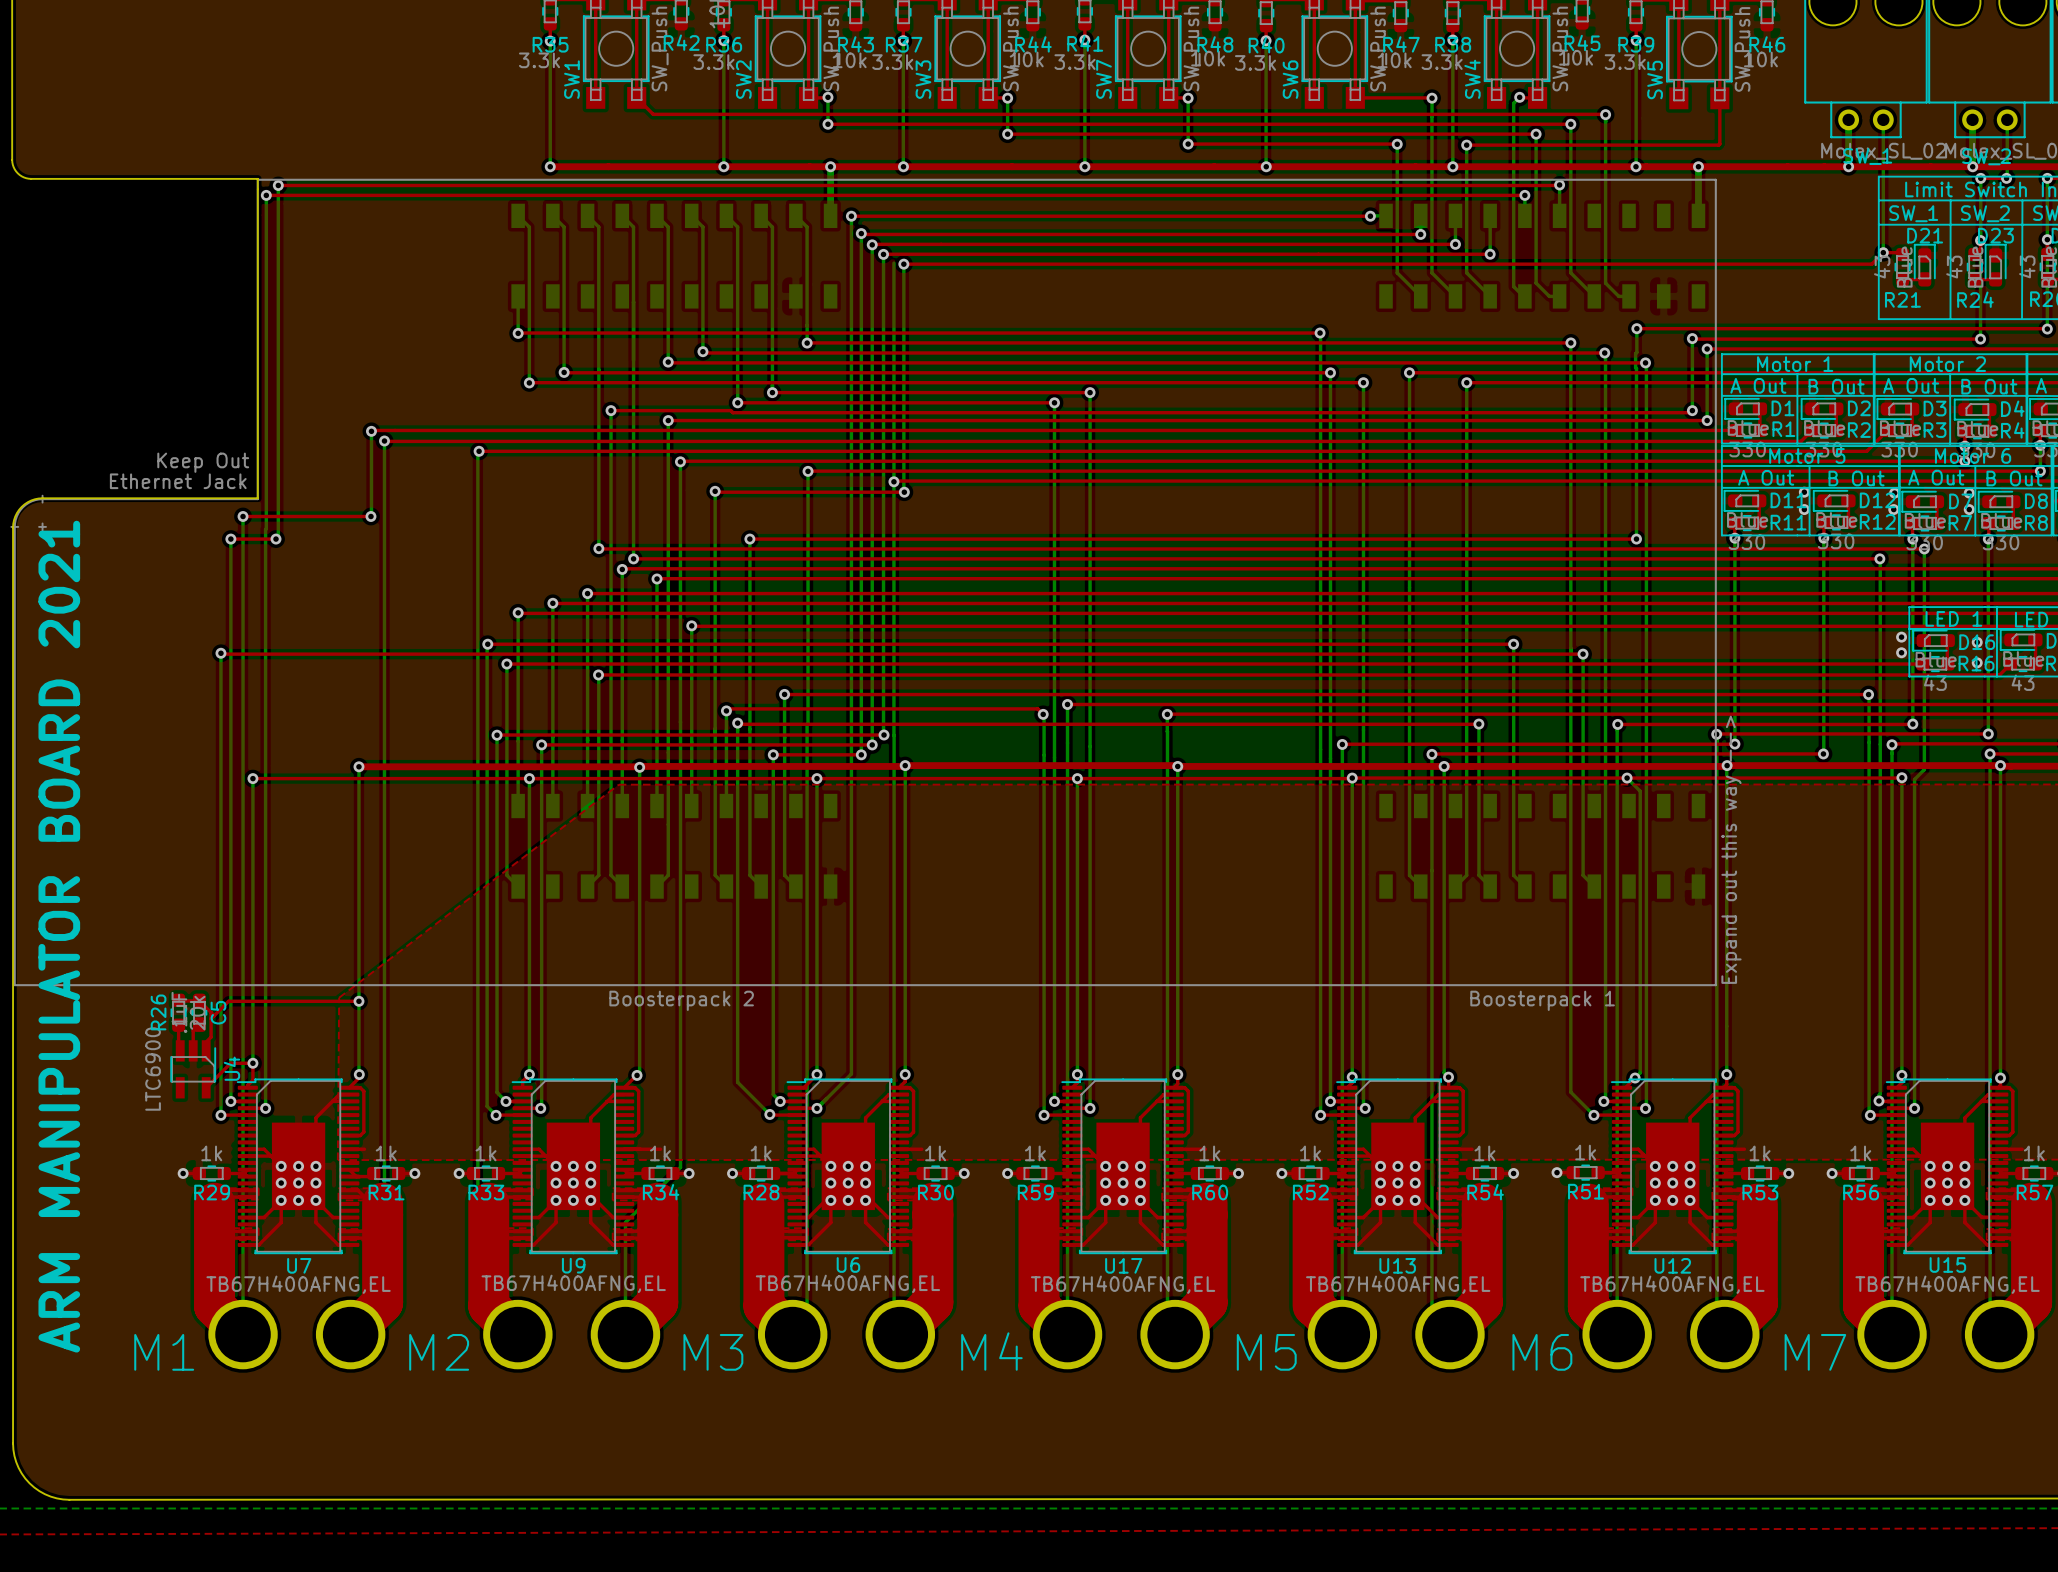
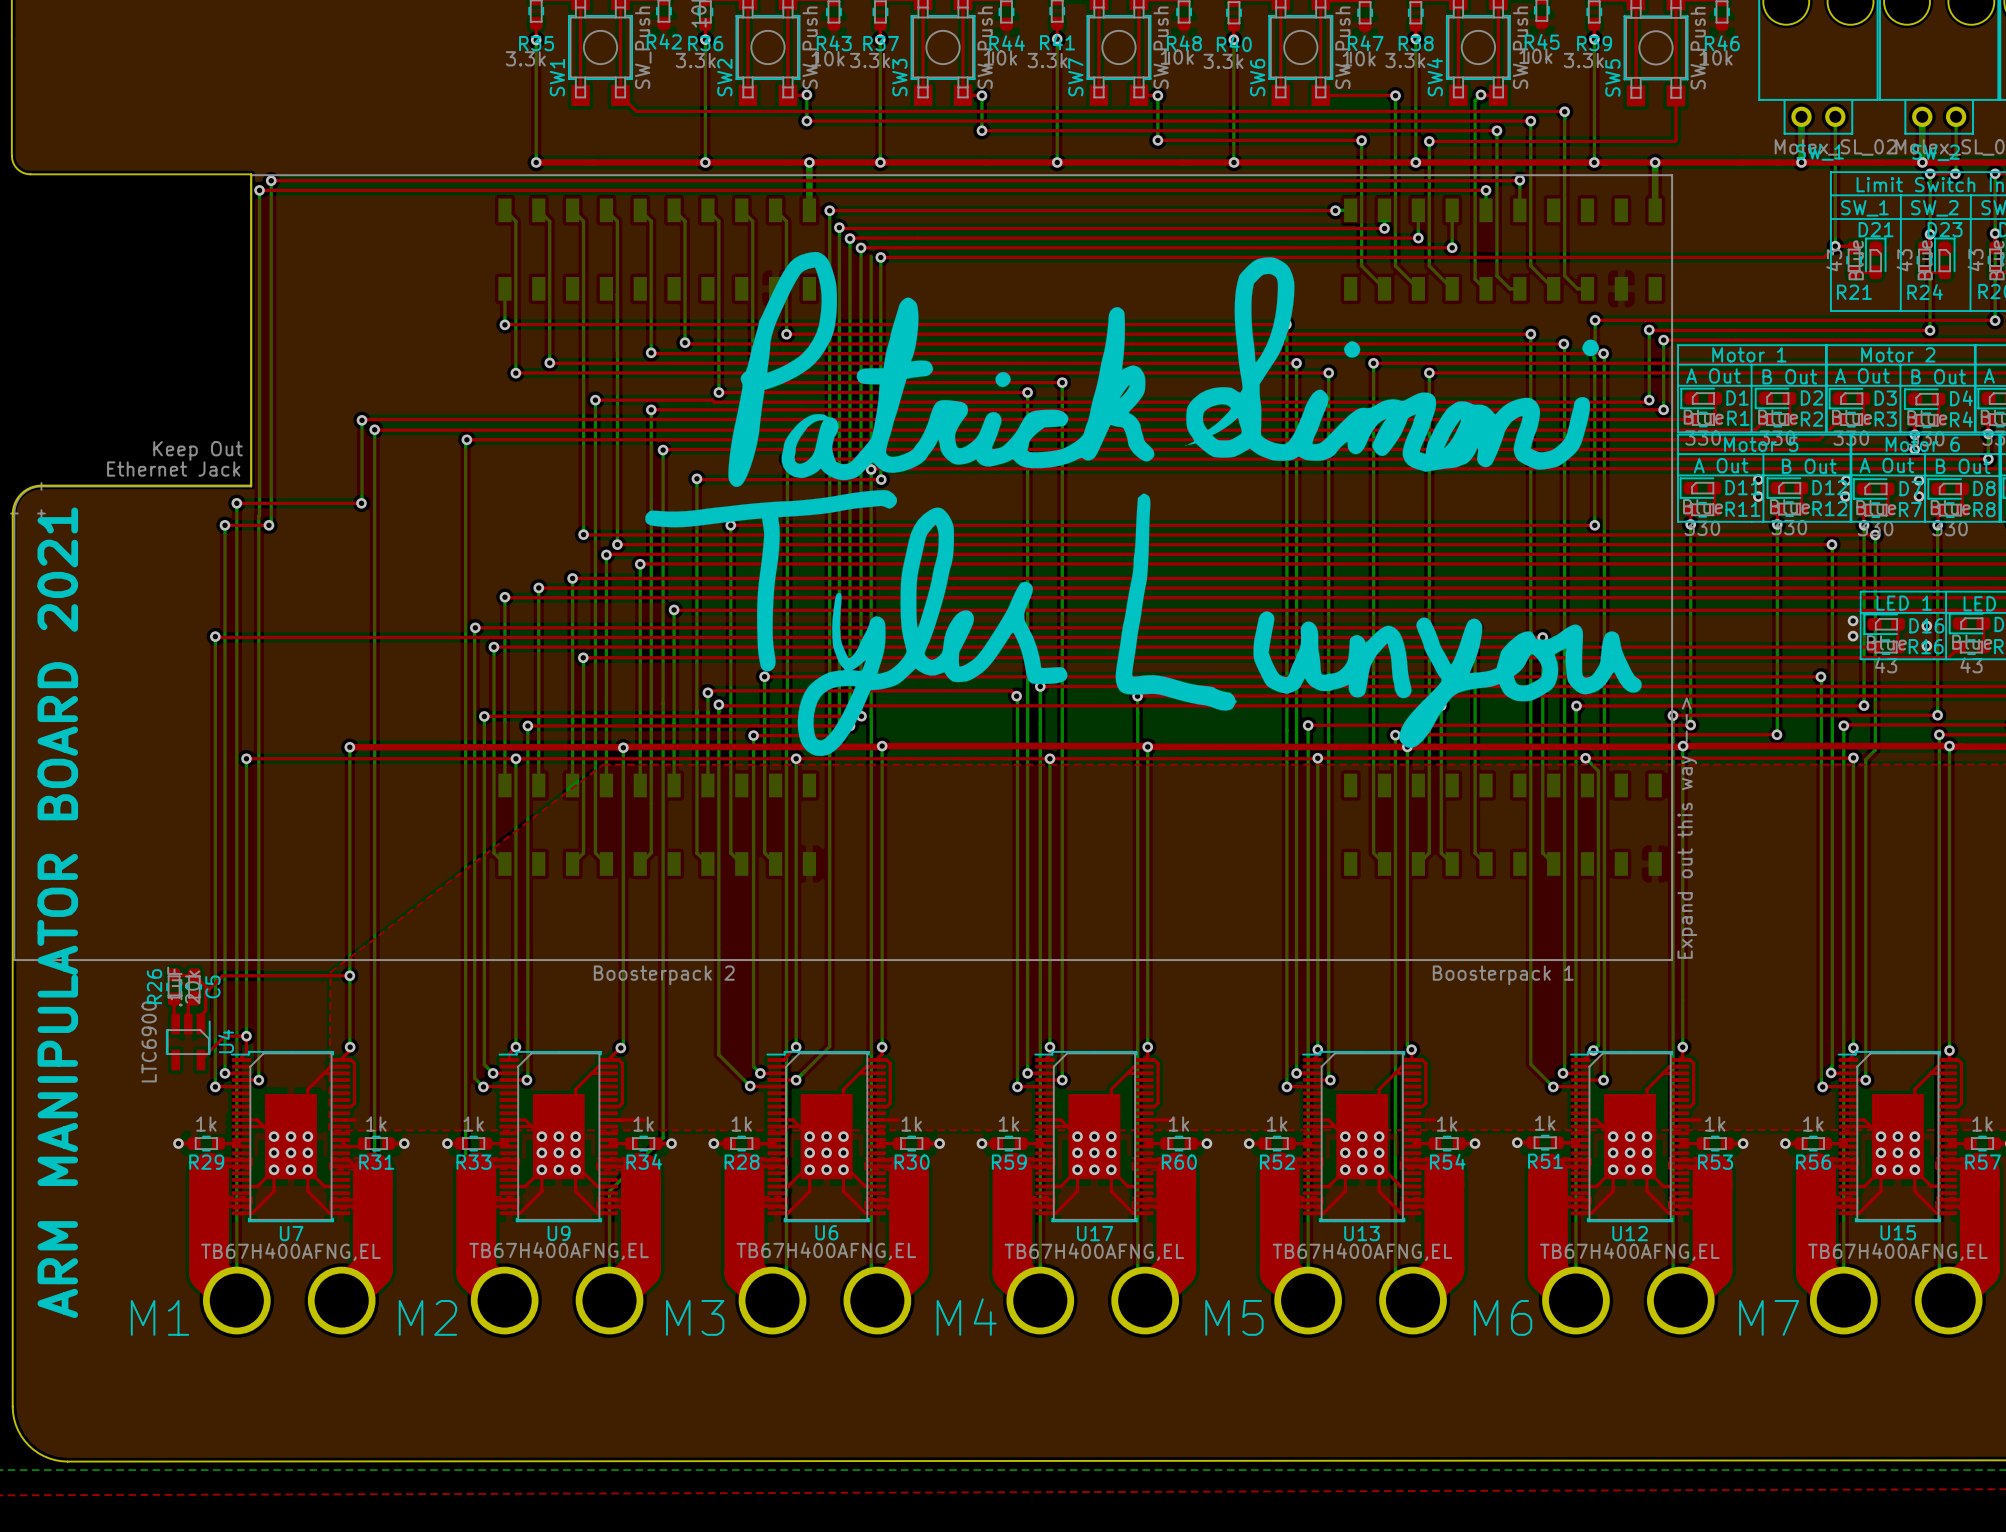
drawing: none -> [645, 251, 1642, 757]

